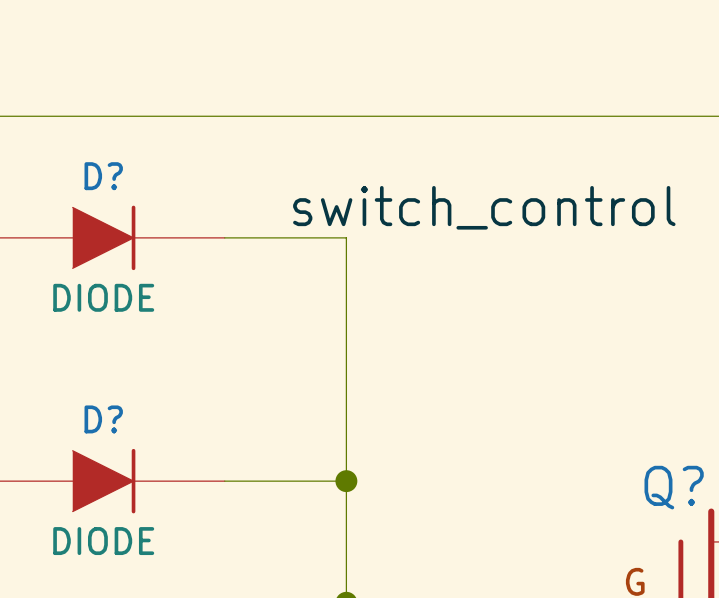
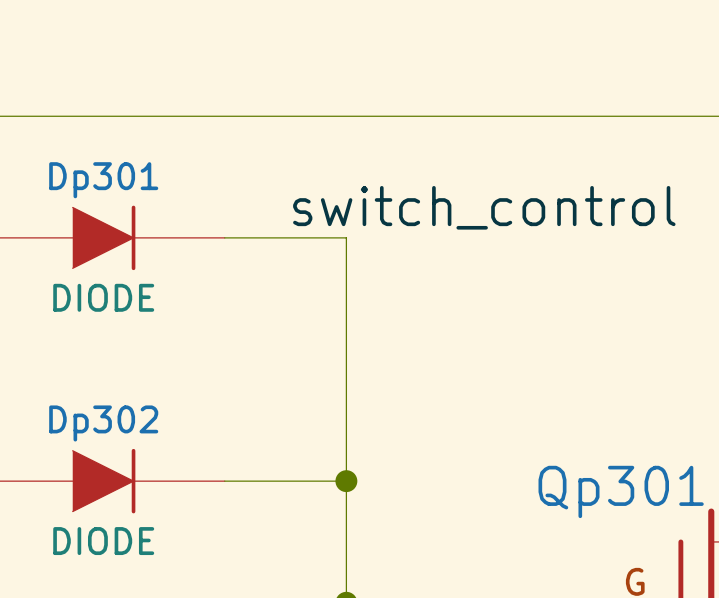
D? name: D? (103, 176) -> Dp301 (103, 180)
D? name: D? (103, 419) -> Dp302 (103, 423)
Q? name: Q? (674, 487) -> Qp301 (621, 491)

